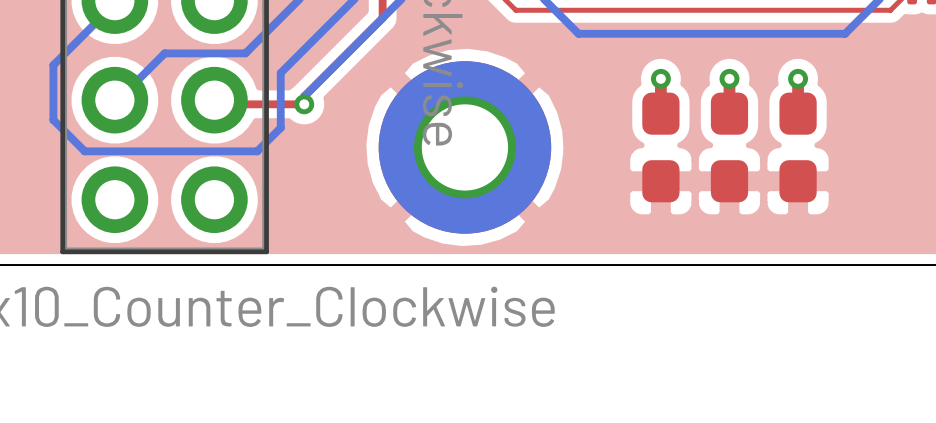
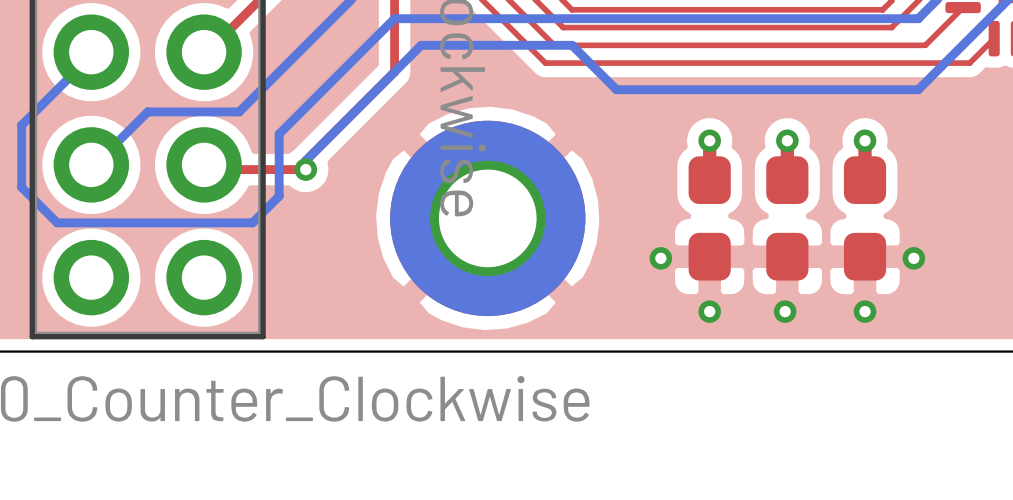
via: none -> (660, 258)
via: none -> (913, 258)
via: none -> (709, 311)
via: none -> (785, 311)
via: none -> (865, 311)

